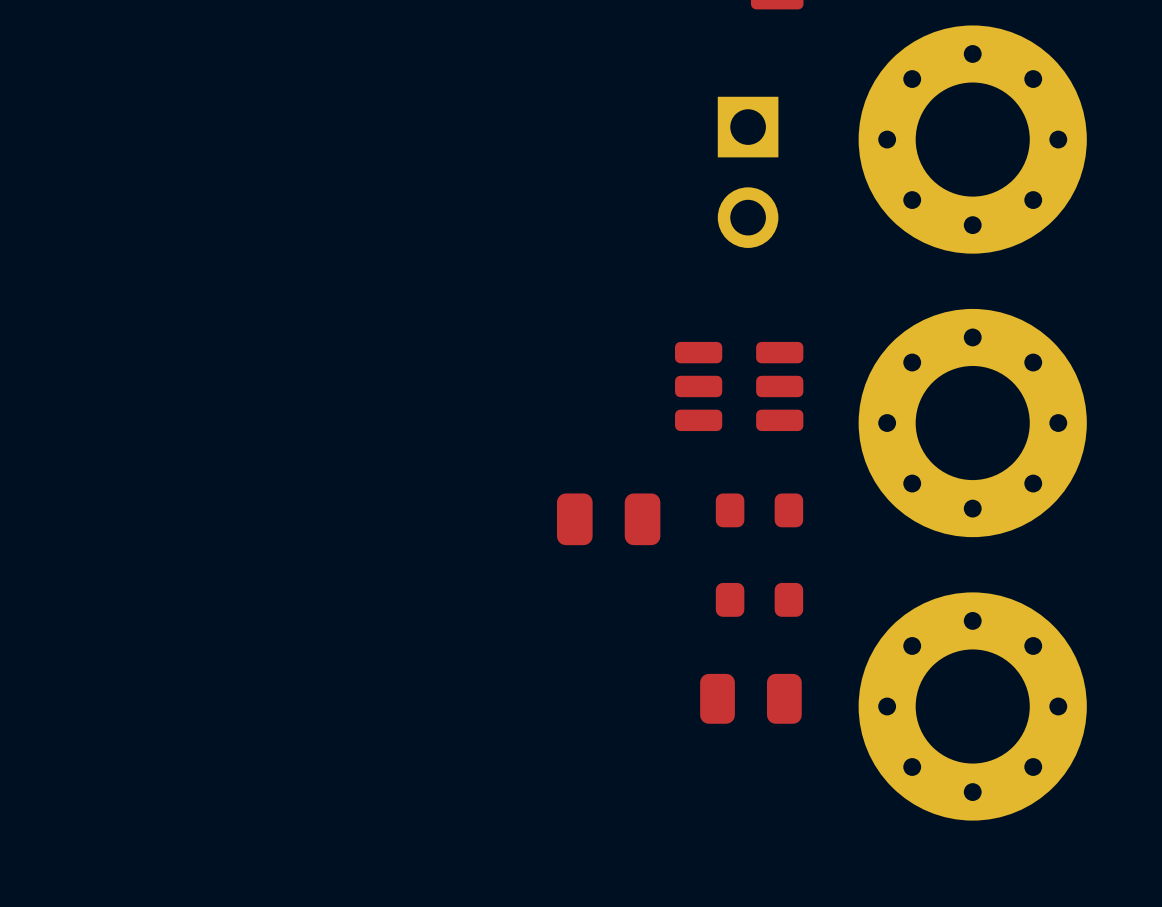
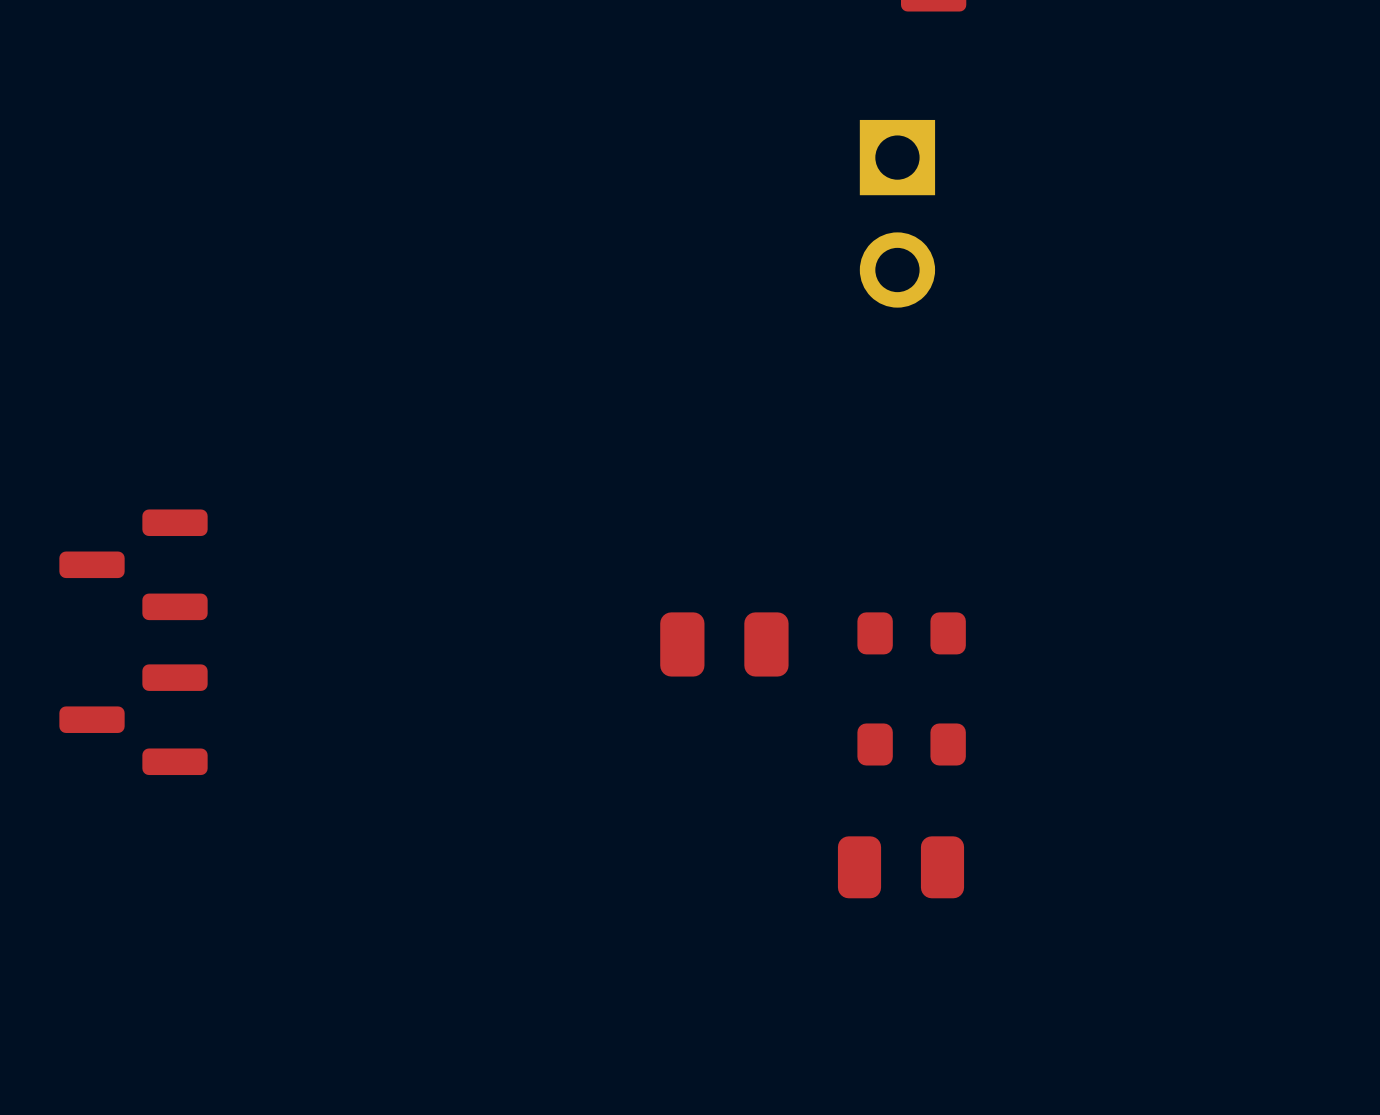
part: (972, 139) -> none
part: (739, 386) -> none
part: (972, 423) -> none
part: none -> (133, 564)
part: none -> (133, 719)
part: (972, 706) -> none

